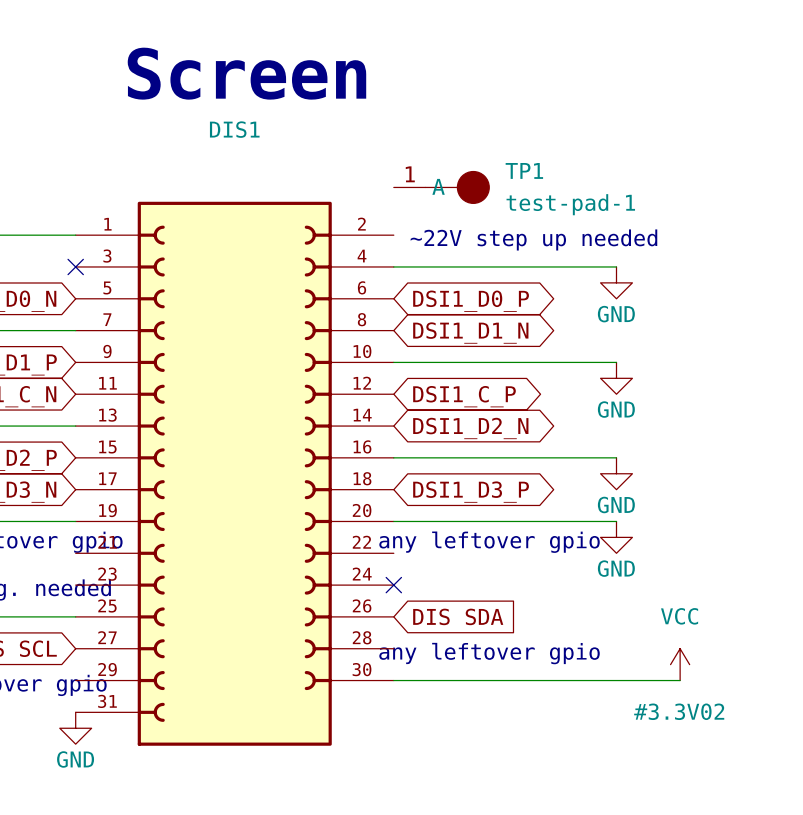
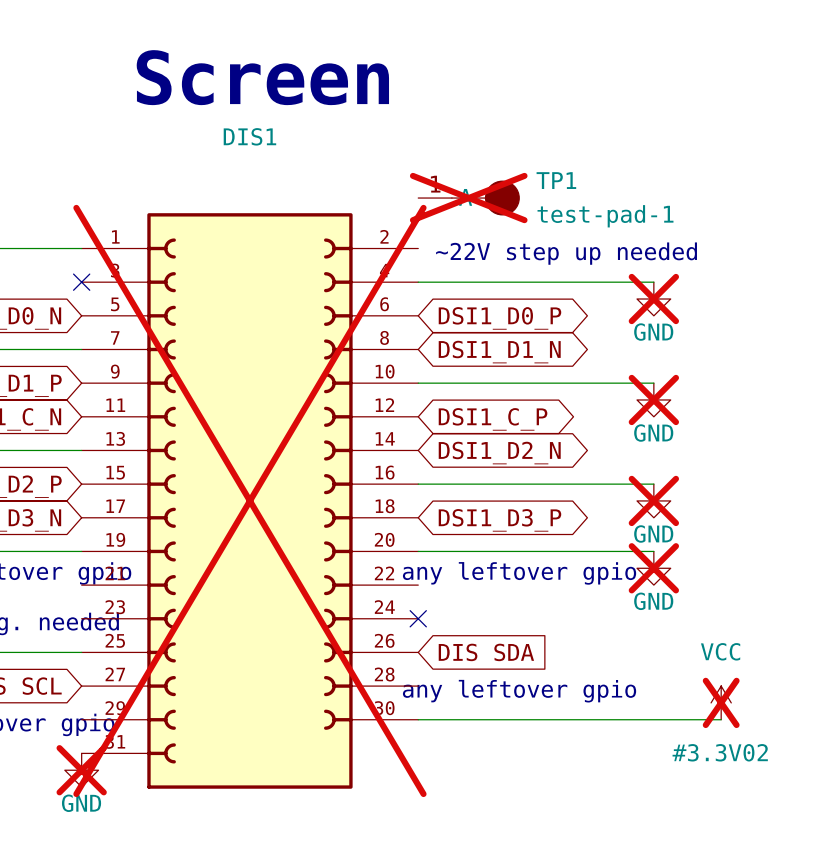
TP1 do-not-place cross: none -> (468, 198)
power symbol do-not-place cross: none -> (653, 299)
power symbol do-not-place cross: none -> (653, 399)
DIS1 do-not-place cross: none -> (249, 500)
power symbol do-not-place cross: none -> (653, 500)
power symbol do-not-place cross: none -> (653, 568)
#3.3V02 do-not-place cross: none -> (721, 702)
power symbol do-not-place cross: none -> (81, 770)

